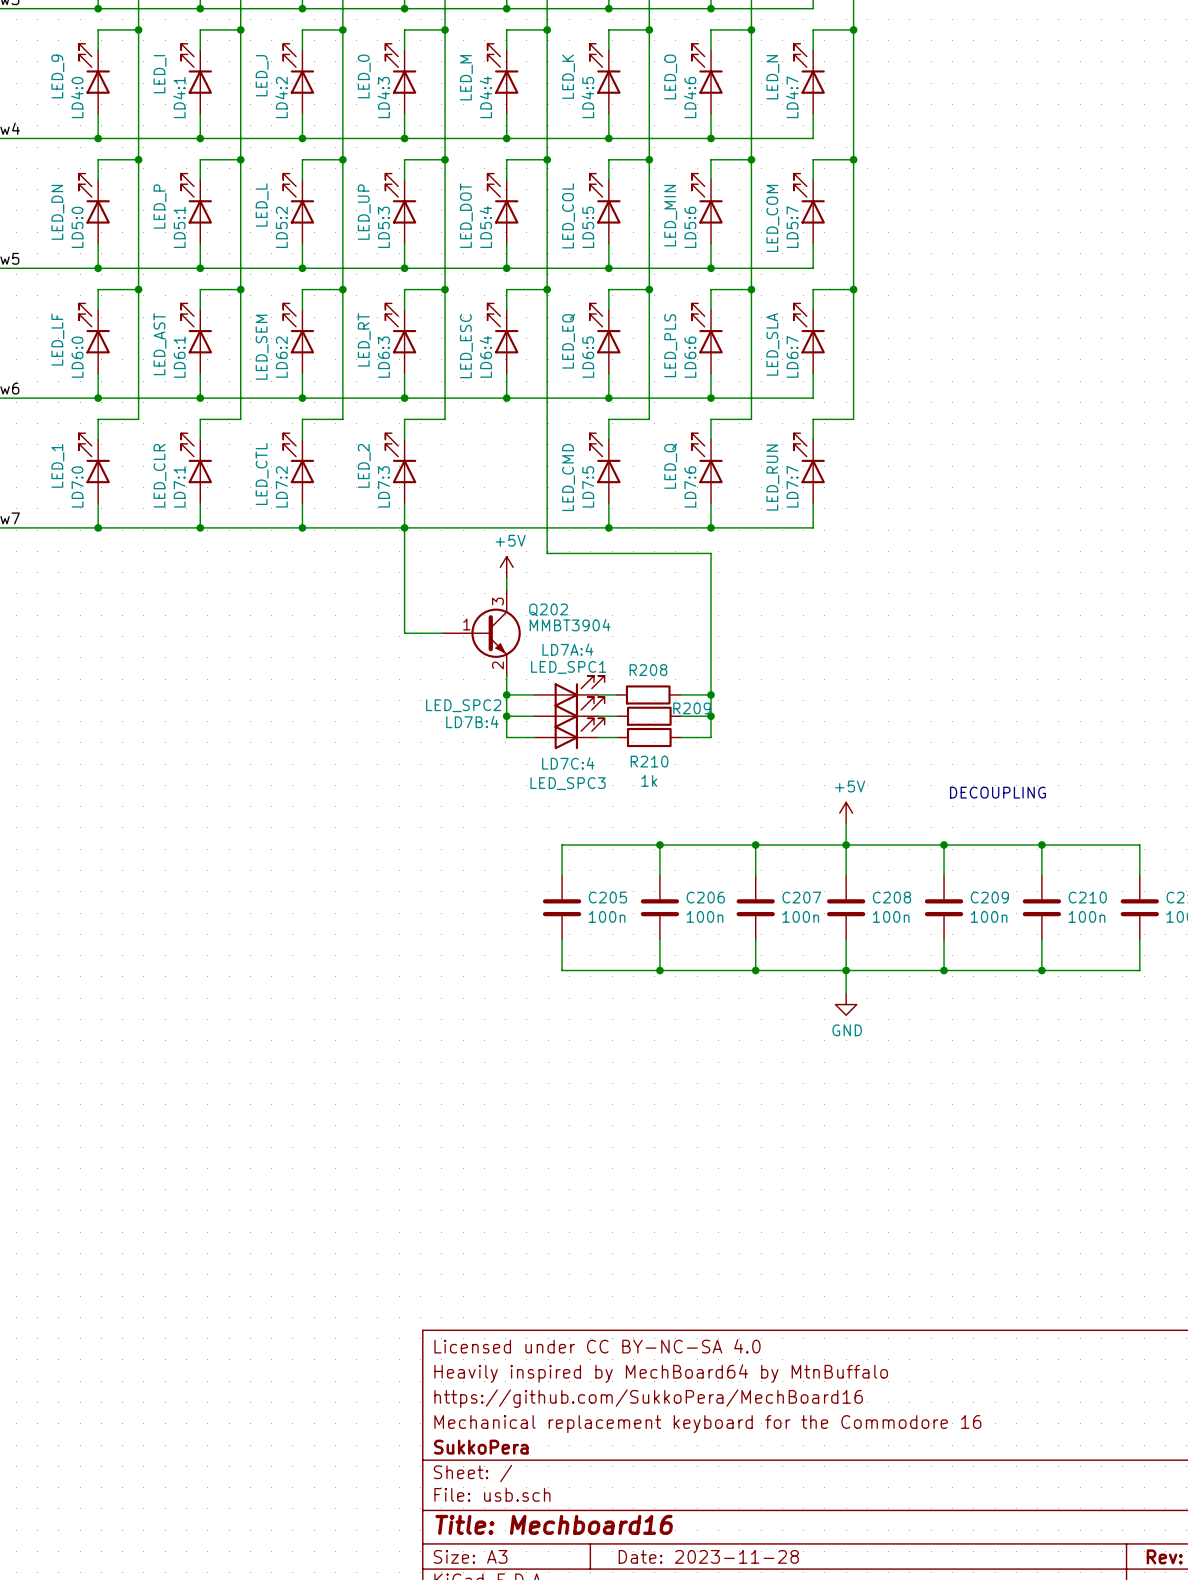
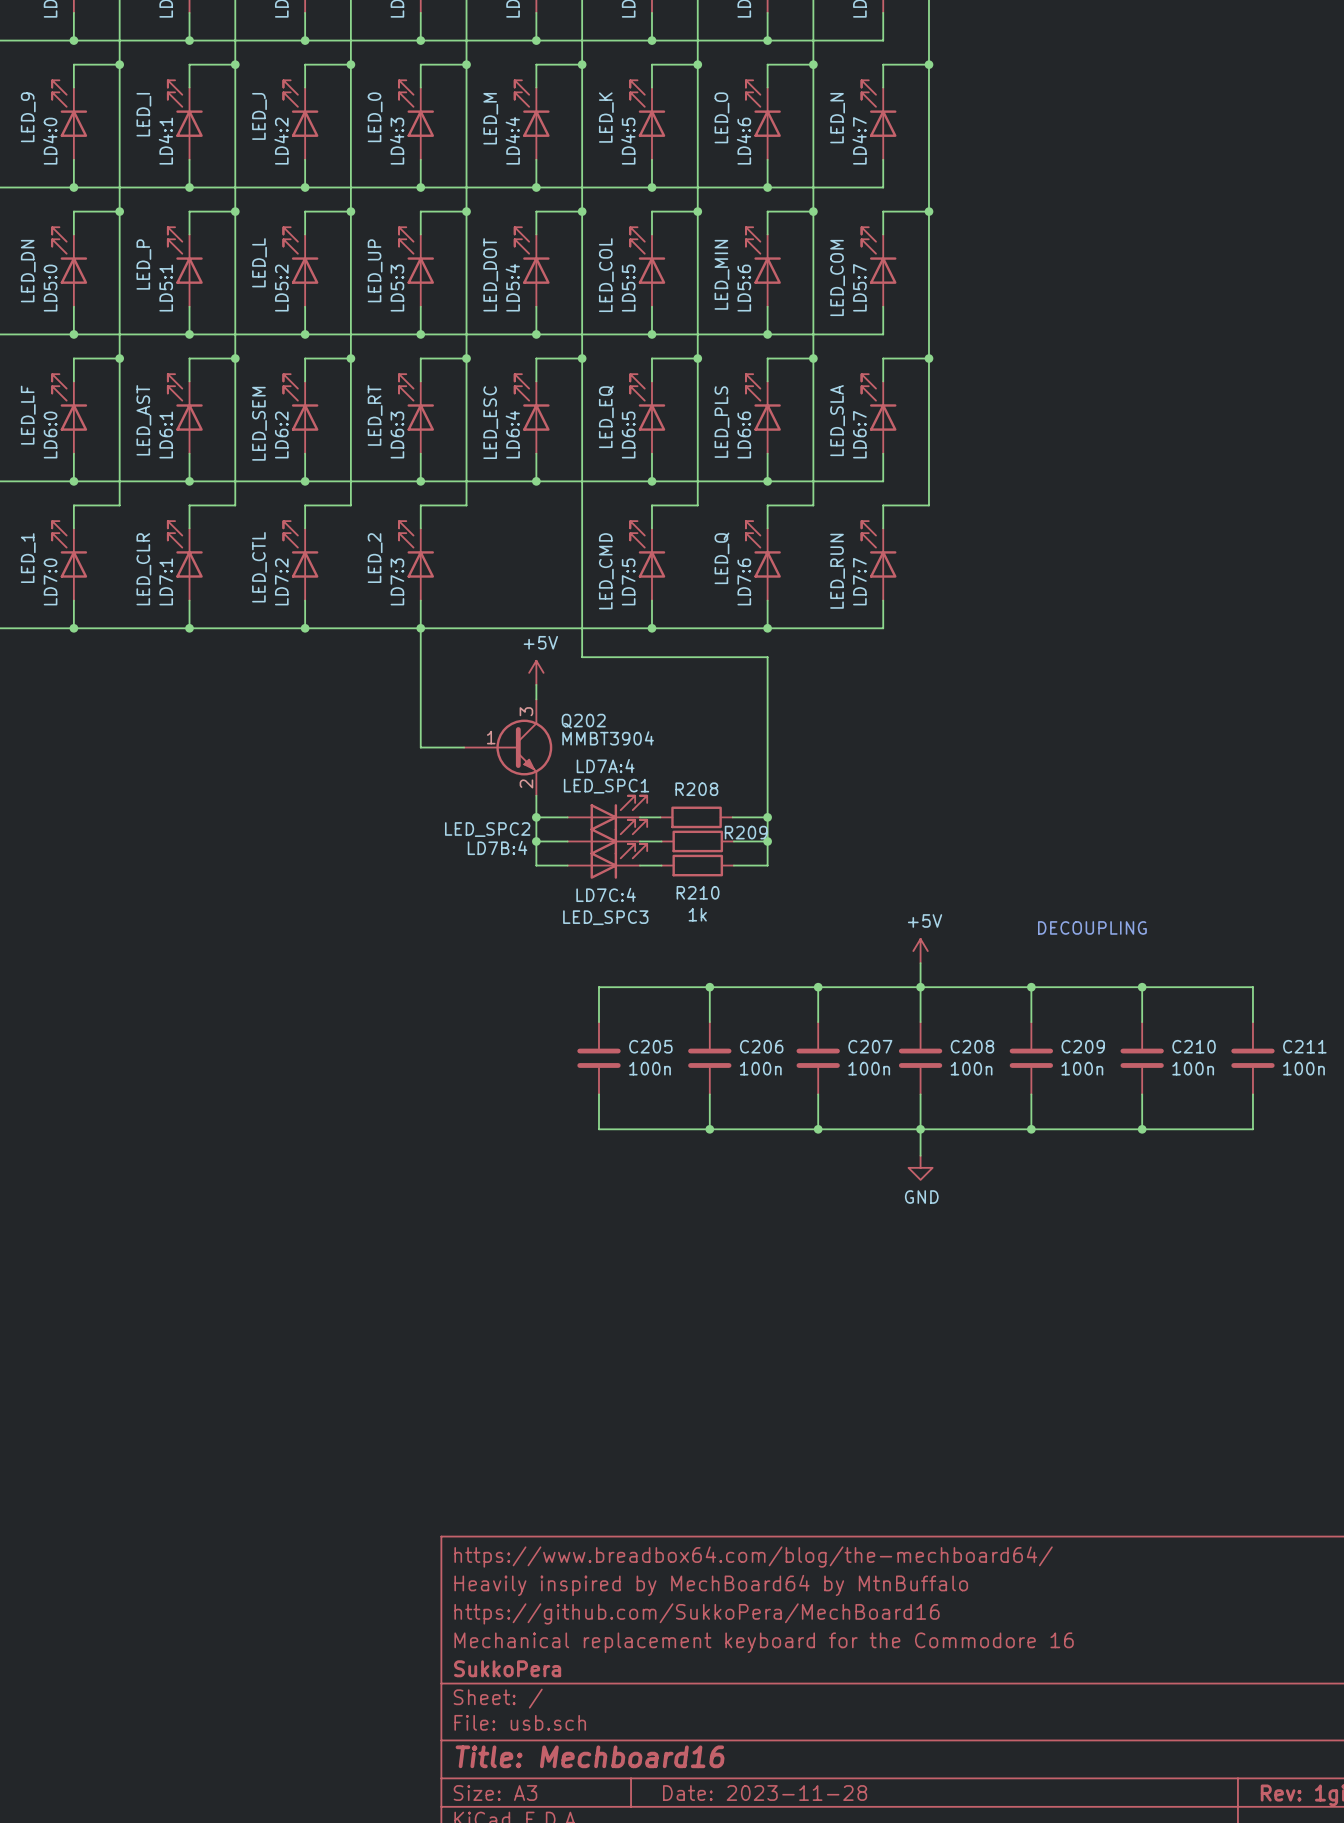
title block: Licensed under CC BY-NC-SA 4.0 (597, 1346) -> https://www.breadbox64.com/blog/the-mechboard64/ (753, 1557)

